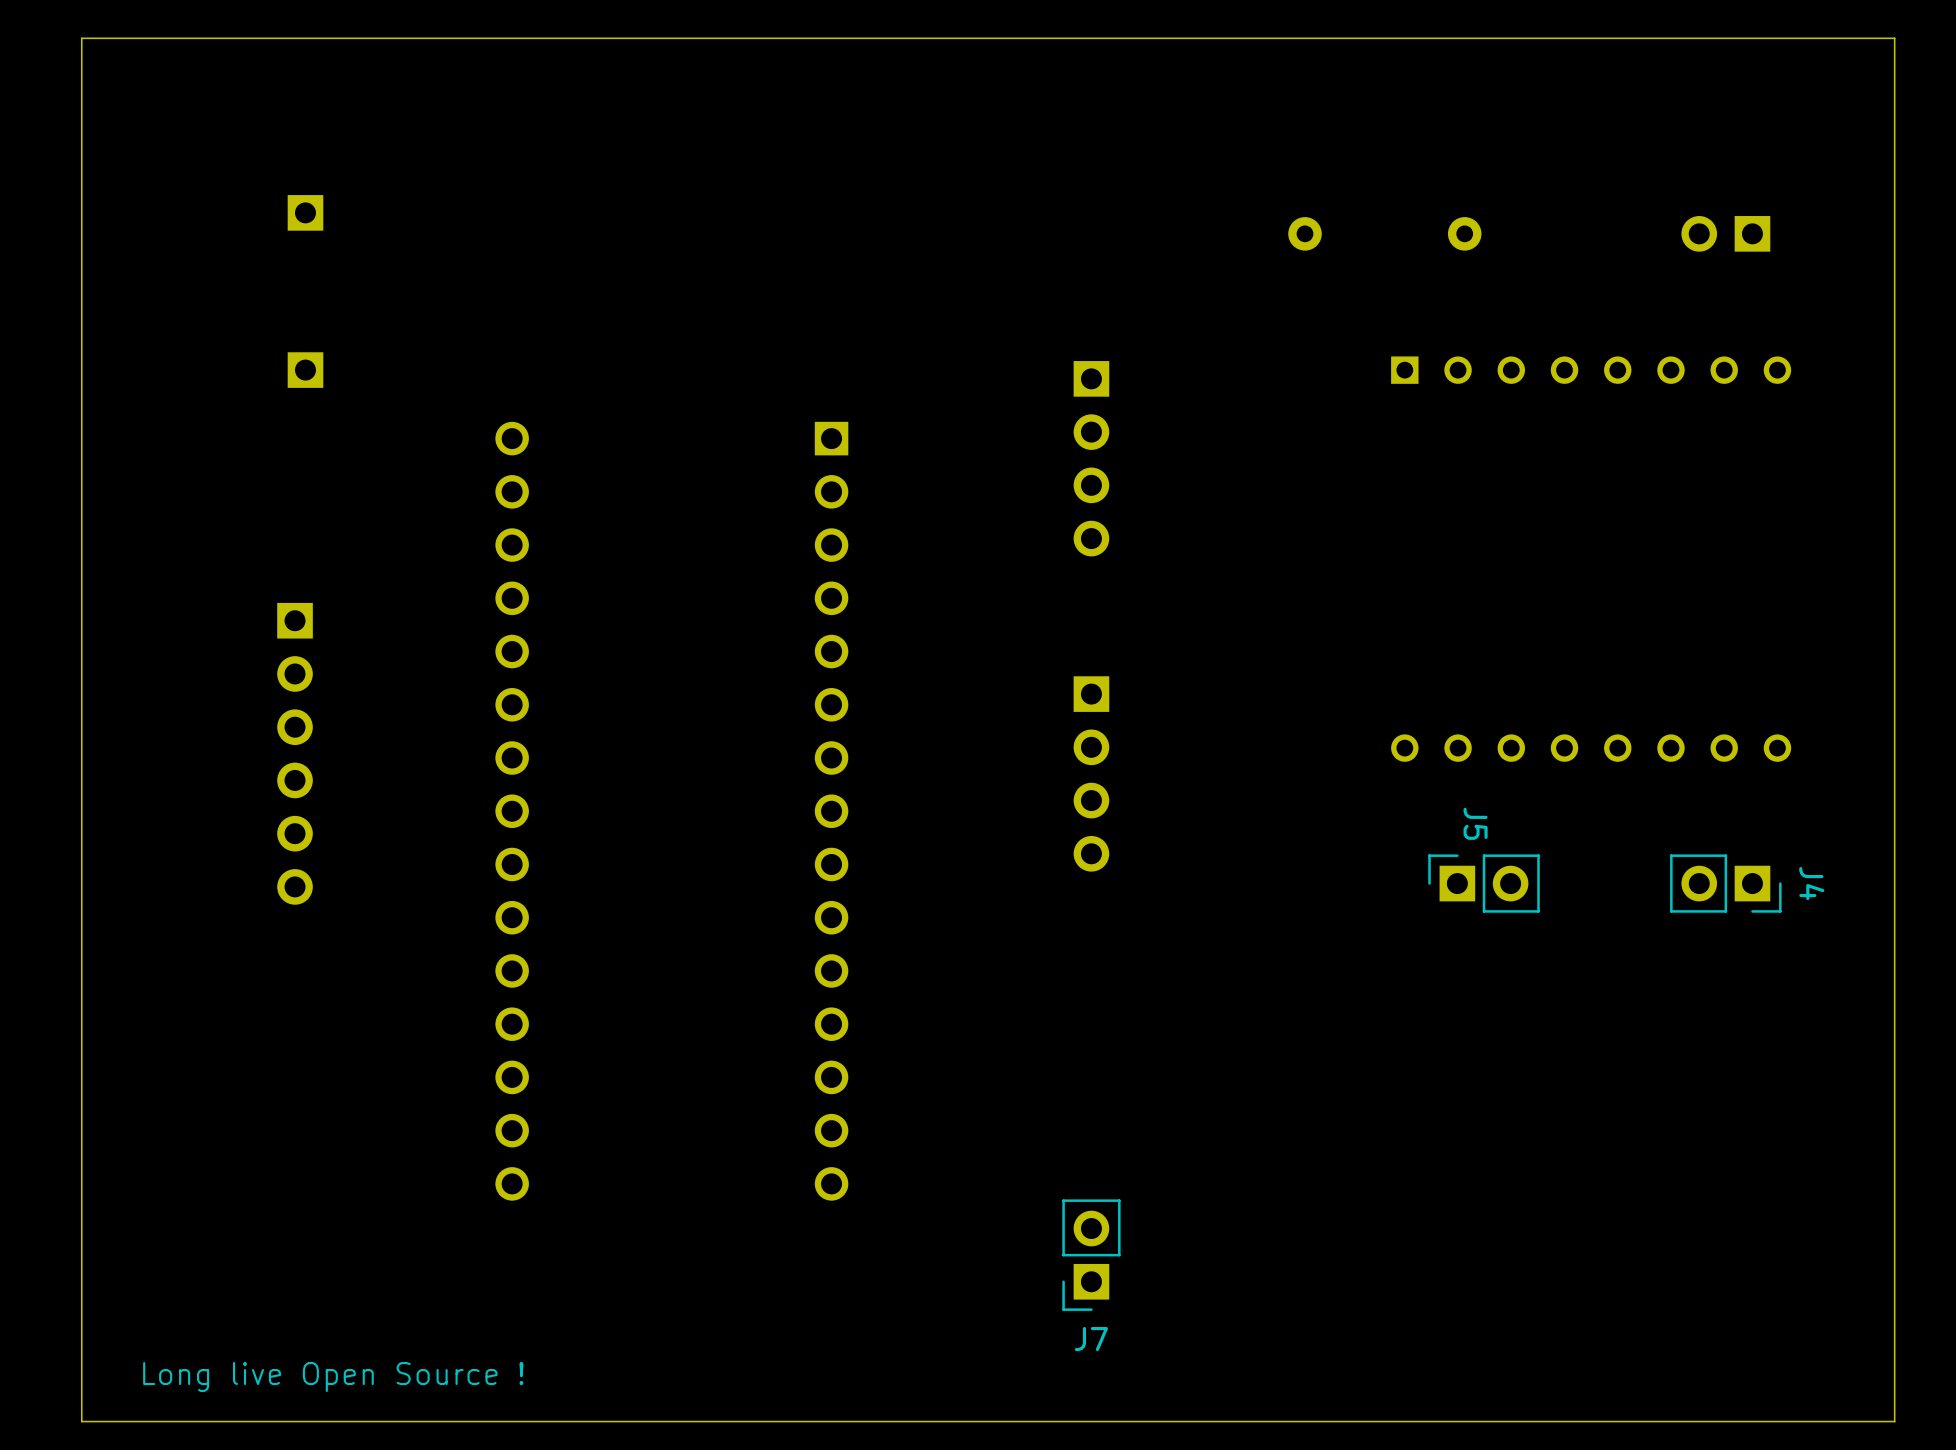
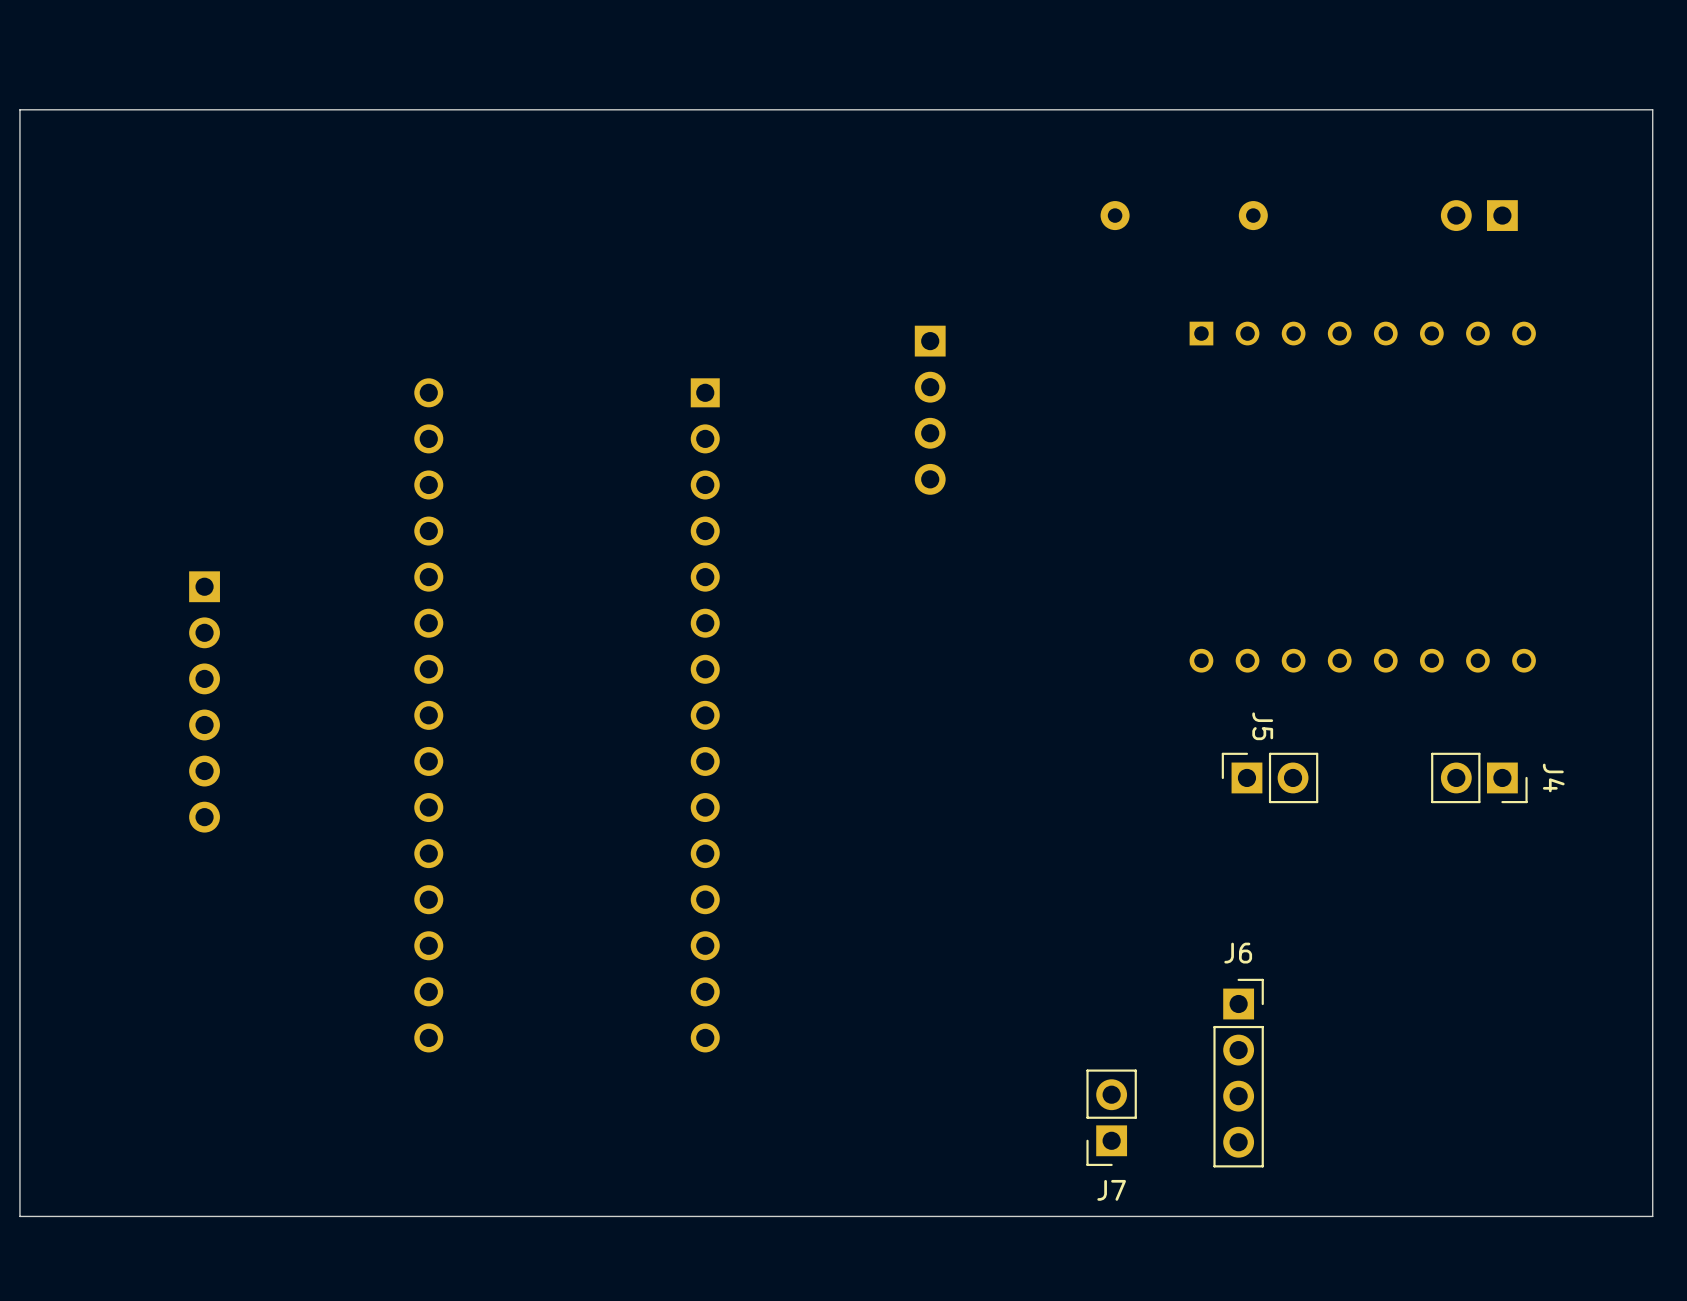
board edge: (1894, 38) (81, 38) (81, 1421) (1894, 1421) (1894, 38) -> (1652, 109) (1652, 1216) (19, 1216) (19, 109) (1652, 109)
part: (305, 212) -> none
part: (305, 370) -> none
part position: (295, 753) -> (204, 701)
part: (1091, 773) -> none
J6: none -> (1238, 1073)
J7 position: (1091, 1255) -> (1111, 1117)
text: Long live Open Source ! (333, 1377) -> none

